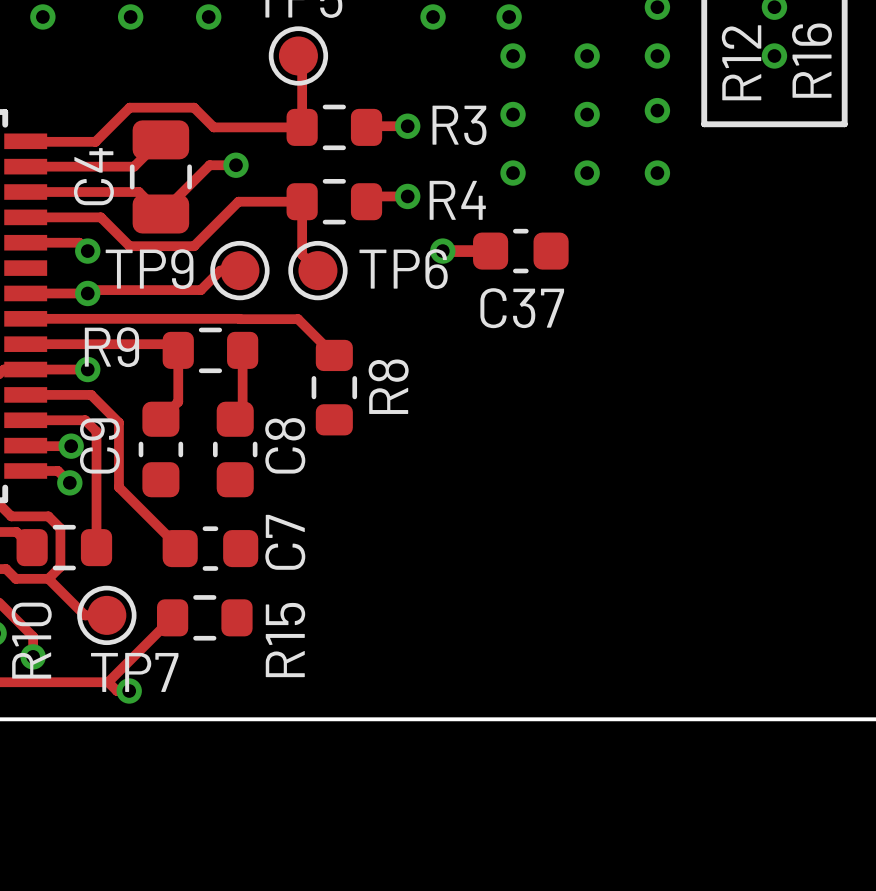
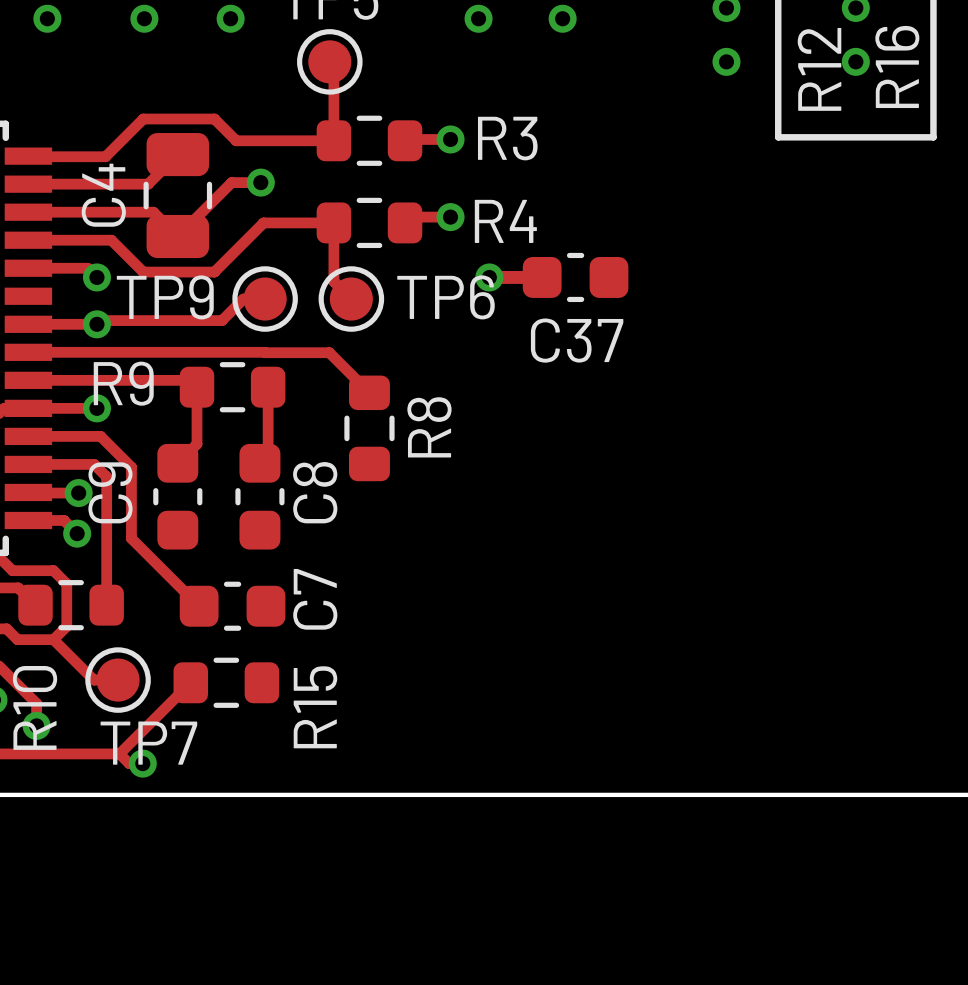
via: (513, 55) -> none
via: (587, 55) -> none
via: (657, 110) -> none
via: (513, 114) -> none
via: (587, 114) -> none
via: (513, 173) -> none
via: (587, 173) -> none
via: (657, 173) -> none

